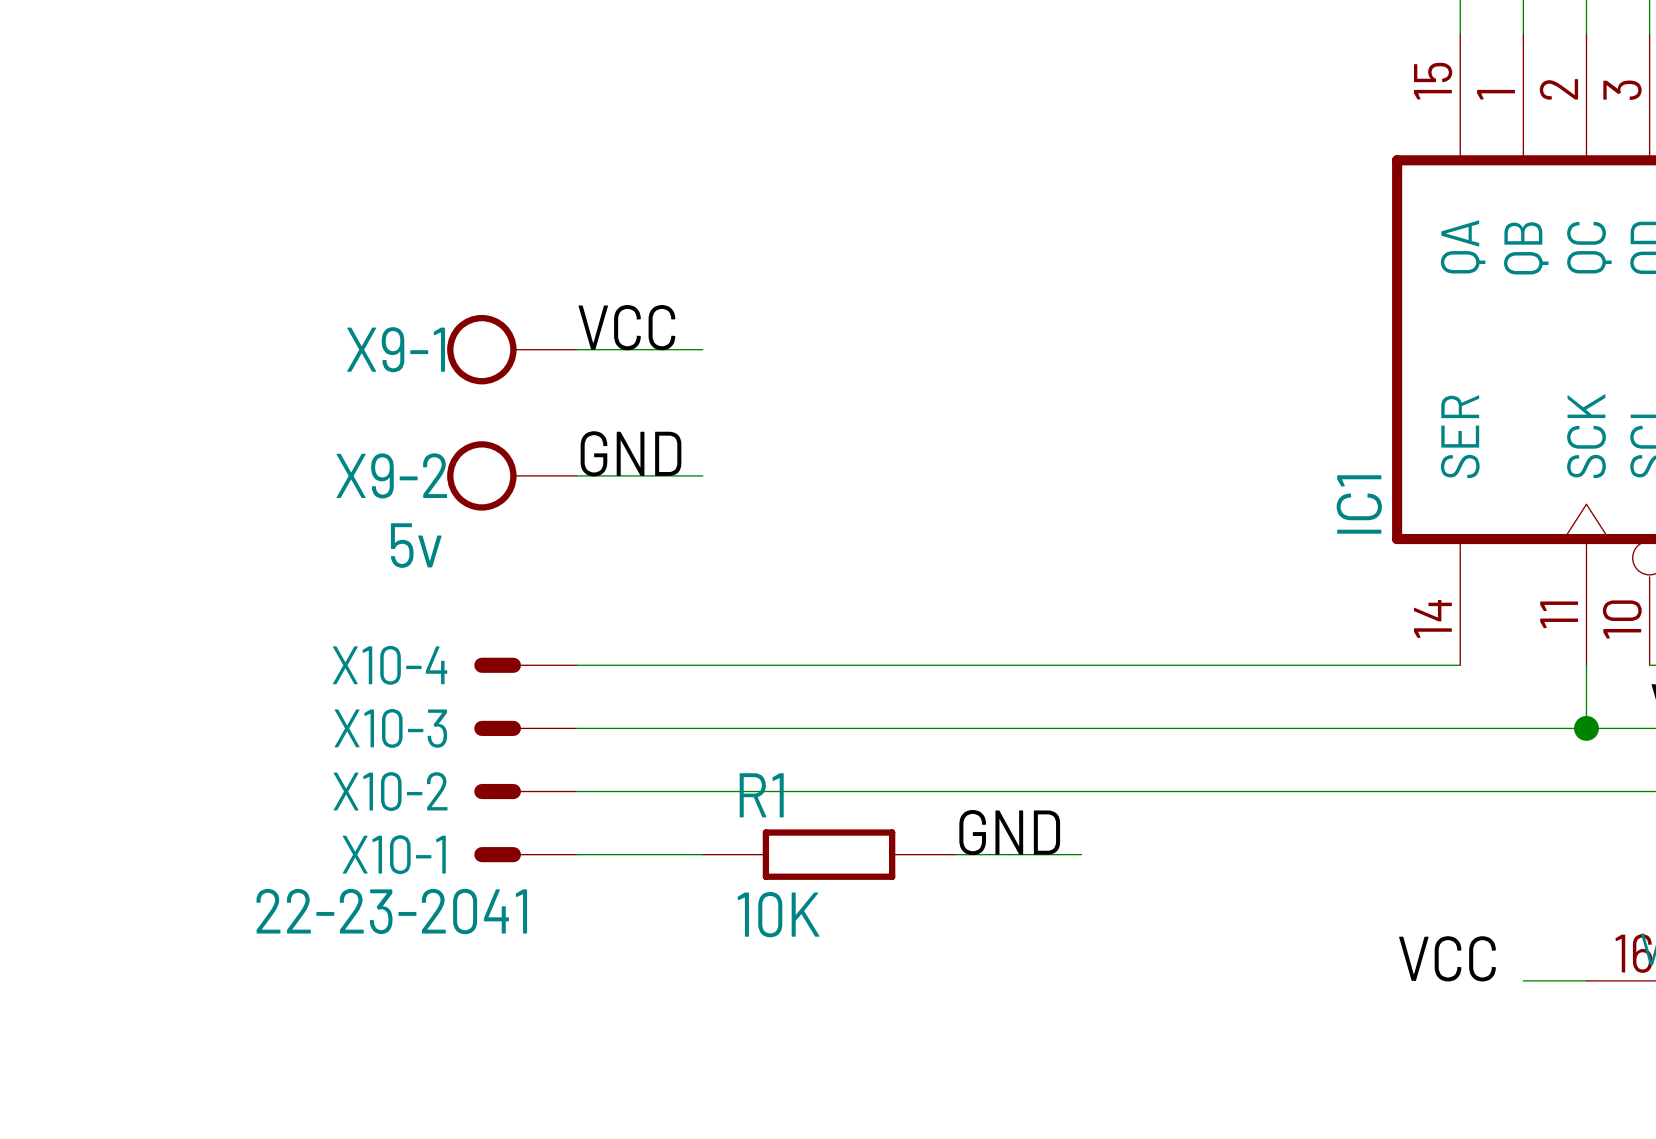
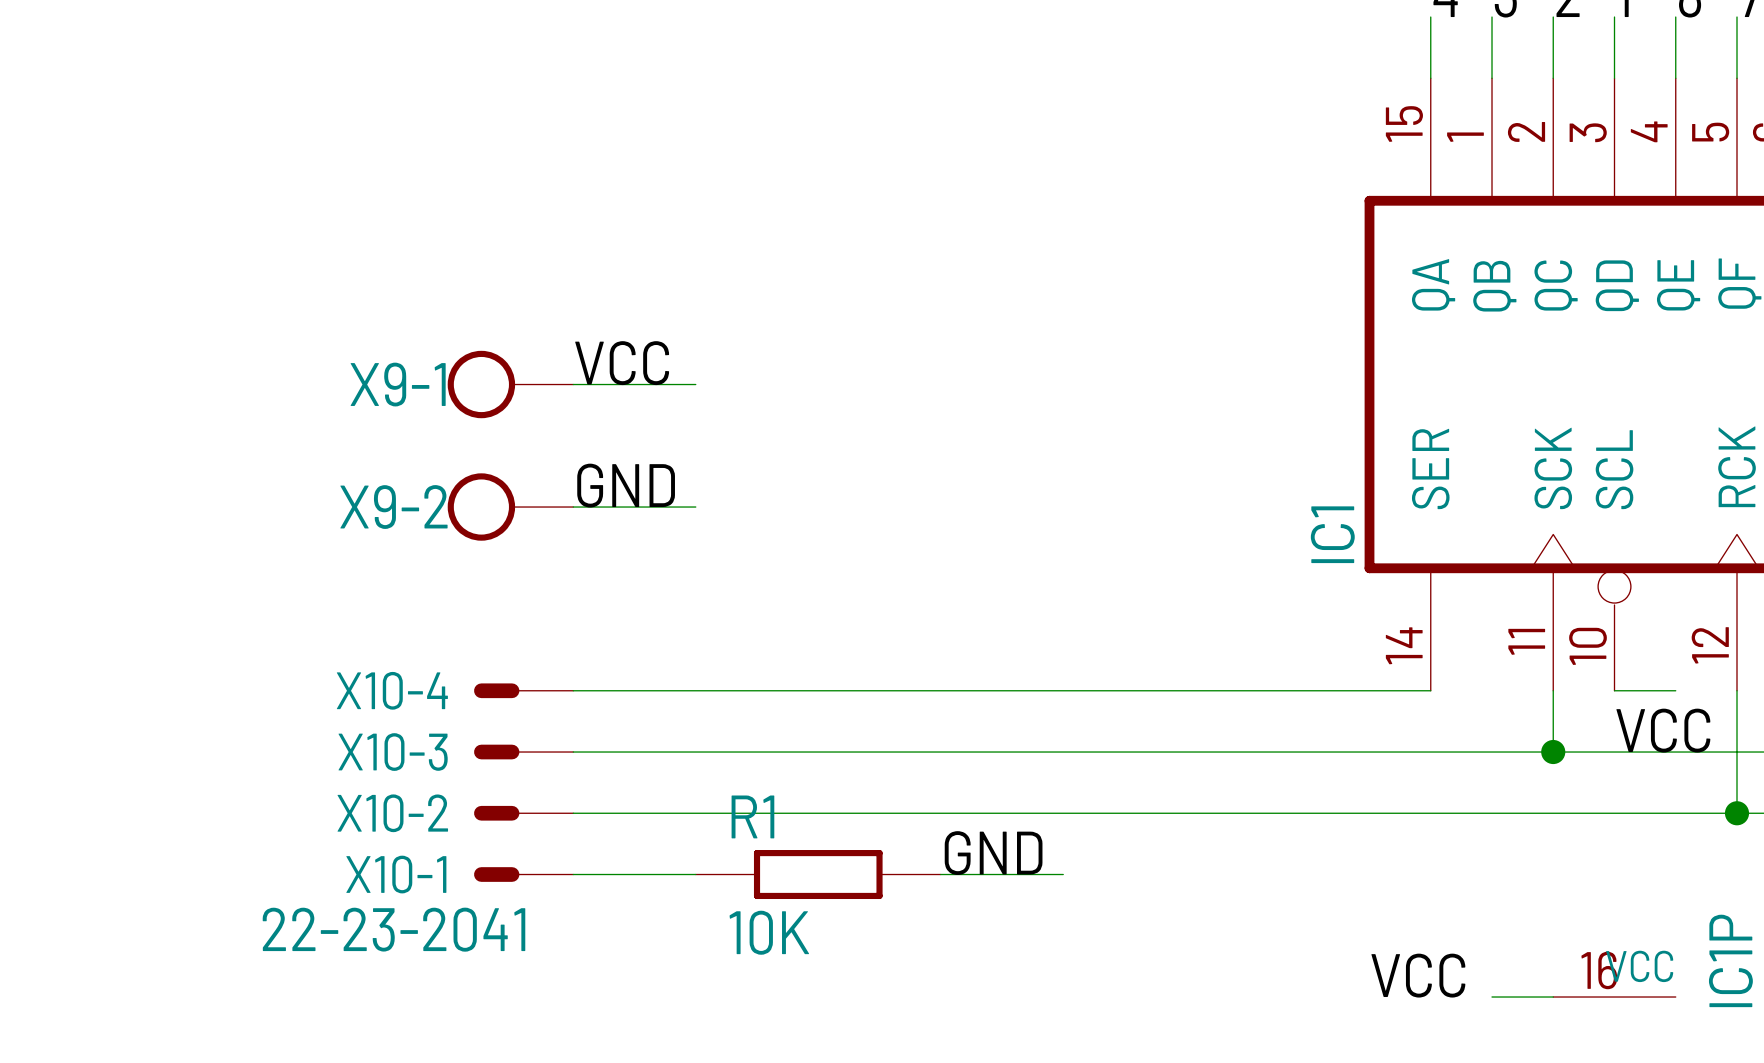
X9-2 value: 5v (416, 545) -> none

